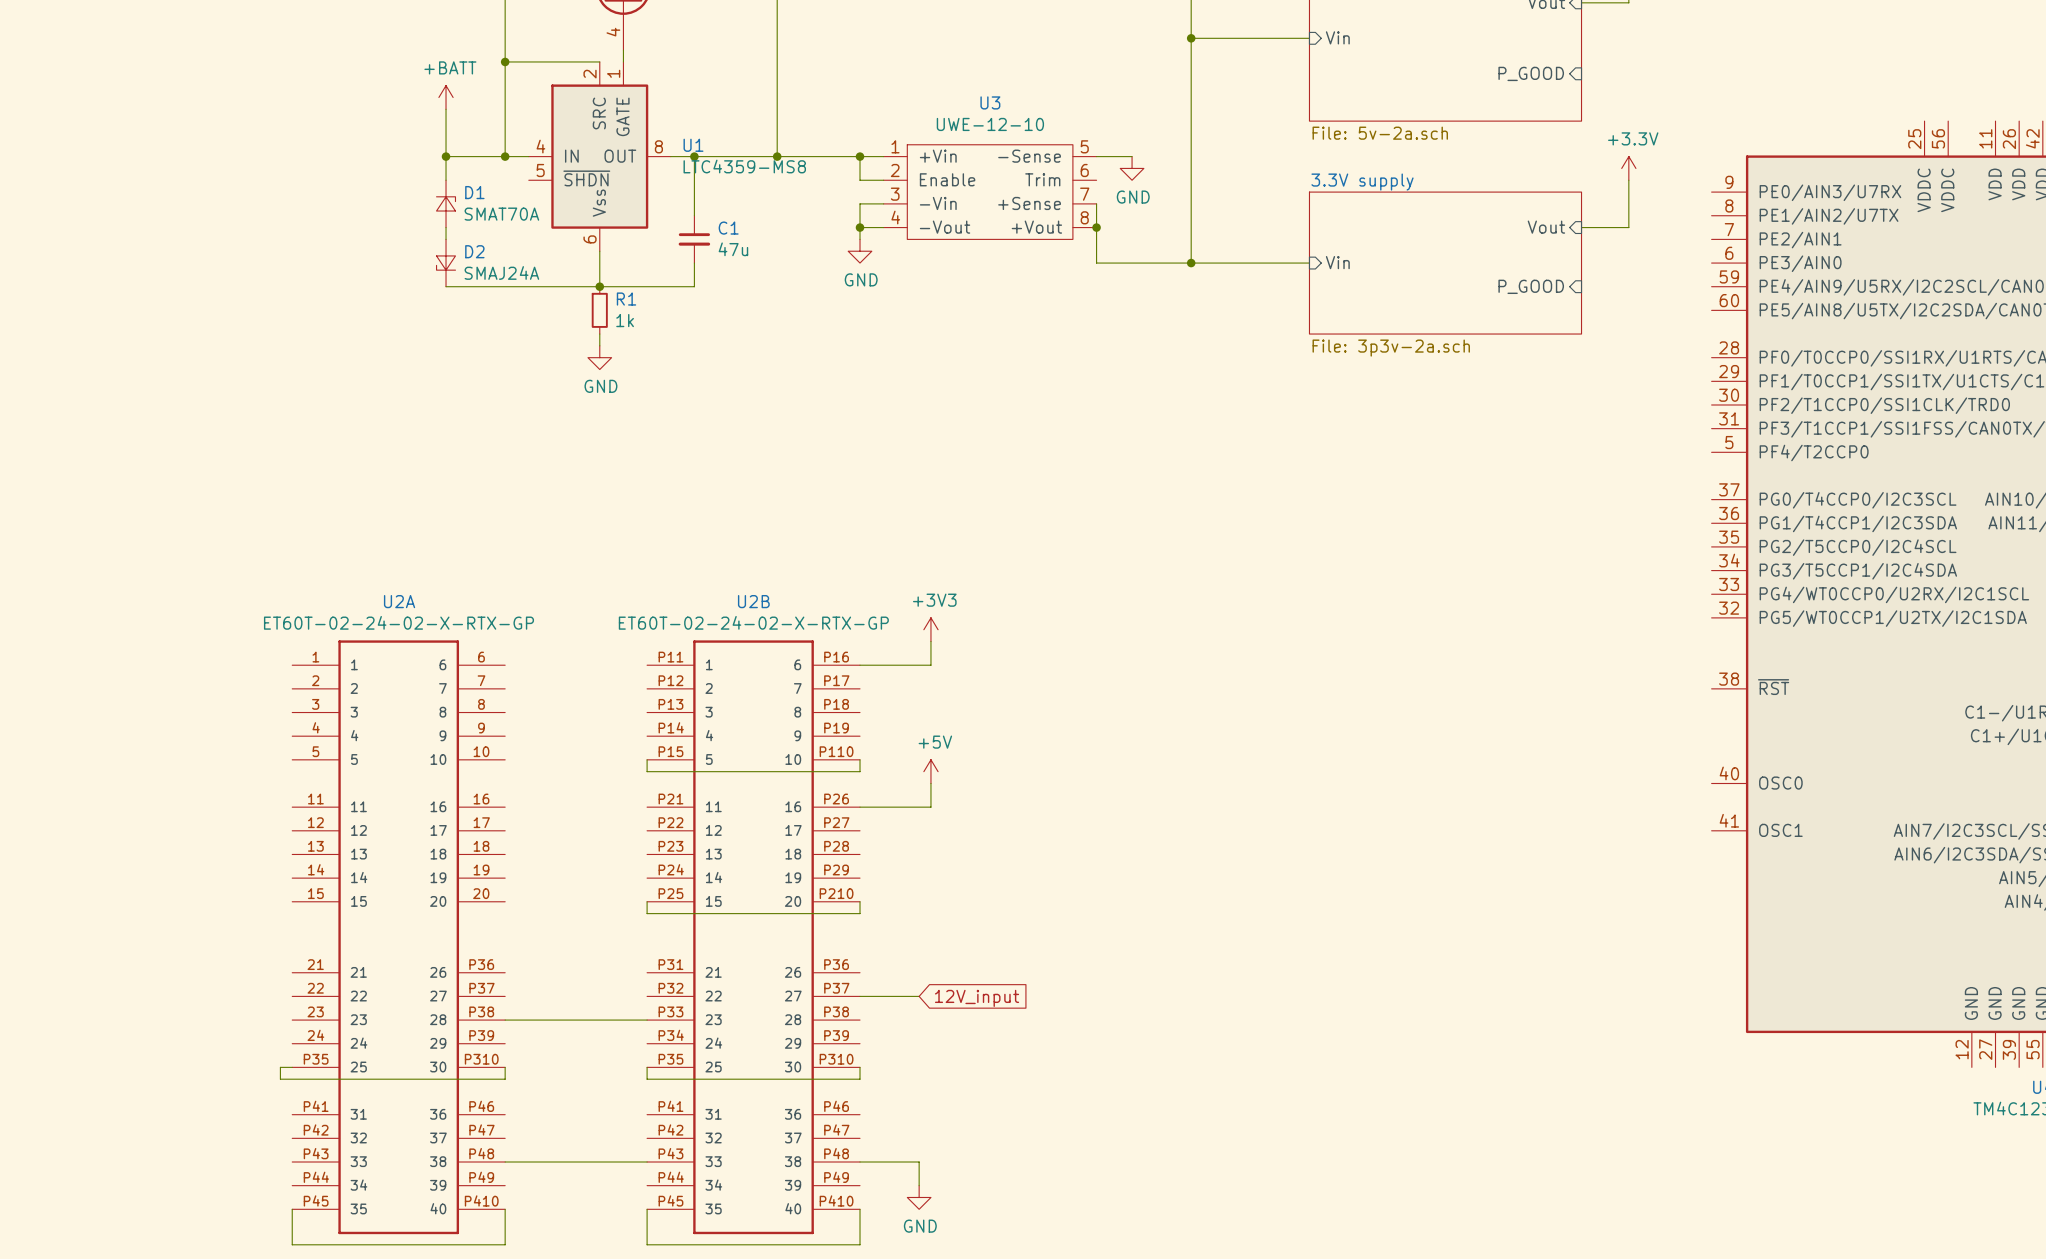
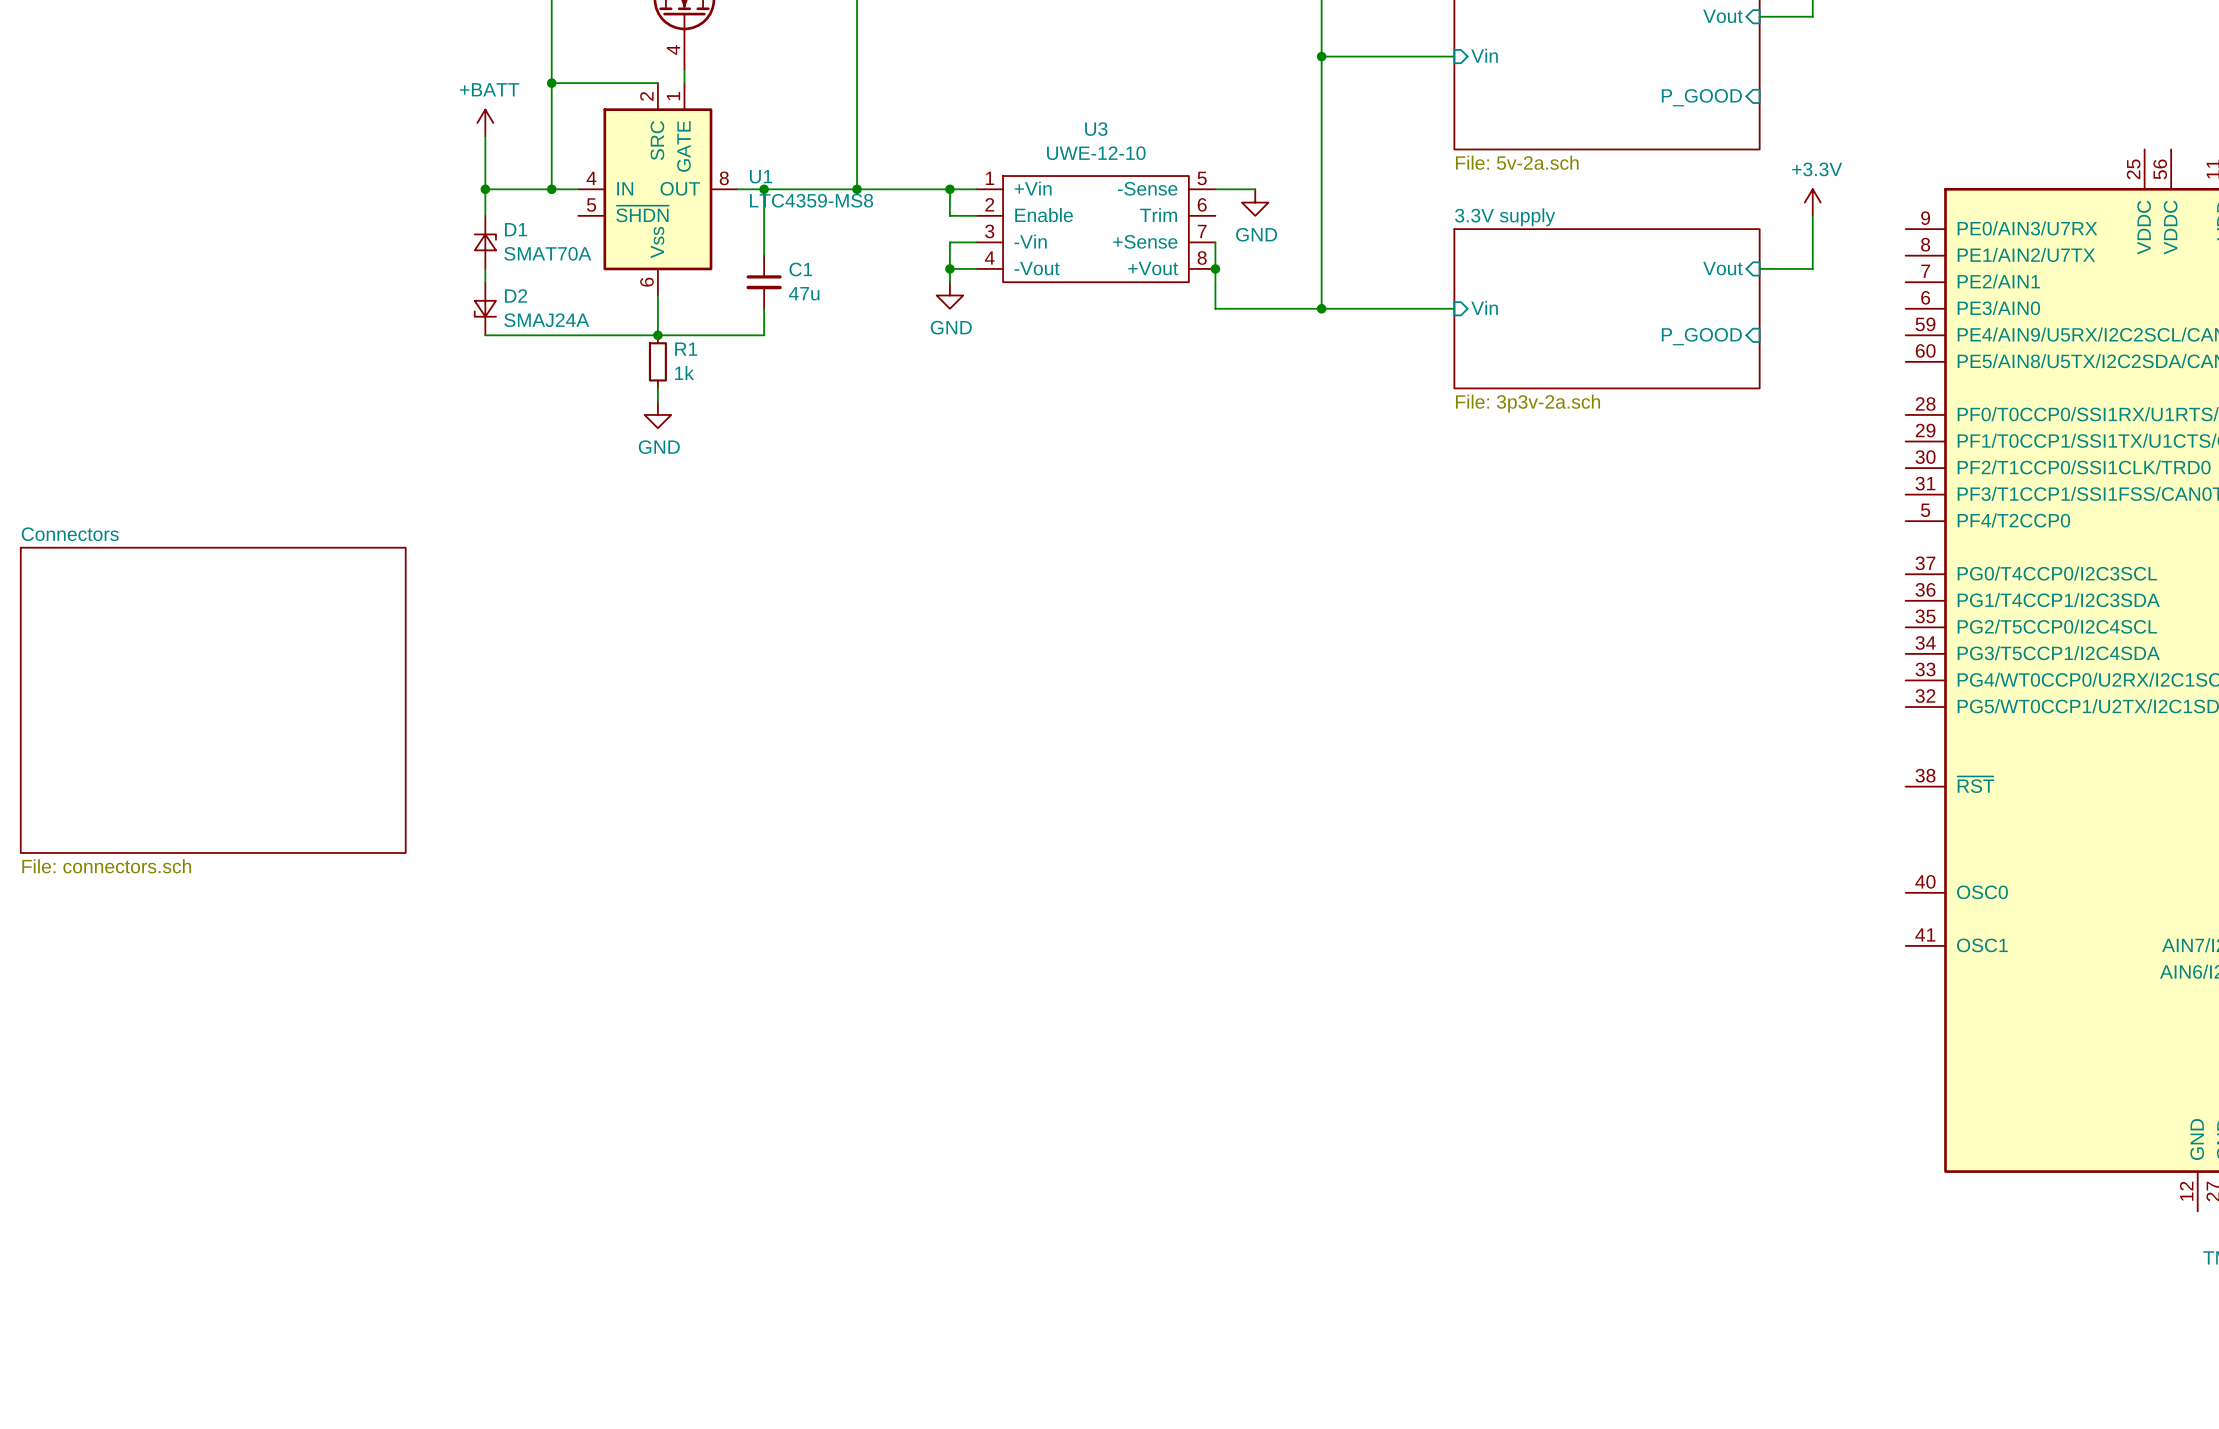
sheet Connectors: none -> File: connectors.sch (213, 700)
power symbol: +3V3 (930, 629) -> none
wire: (930, 641) (930, 665) (860, 665) -> none
wire: (647, 759) (647, 771) (860, 771) (860, 759) -> none
power symbol: +5V (930, 771) -> none
wire: (930, 783) (930, 807) (860, 807) -> none
wire: (647, 901) (647, 913) (860, 913) (860, 901) -> none
U2A: ET60T-02-24-02-X-RTX-GP (398, 937) -> none
U2B: ET60T-02-24-02-X-RTX-GP (753, 937) -> none
wire: (860, 996) (919, 996) -> none
global label: 12V_input (977, 998) -> none
wire: (505, 1020) (647, 1020) -> none
wire: (292, 1067) (280, 1067) (280, 1079) (505, 1079) (505, 1067) -> none
wire: (647, 1067) (647, 1079) (860, 1079) (860, 1067) -> none
wire: (505, 1162) (647, 1162) -> none
wire: (860, 1162) (919, 1162) (919, 1185) -> none
power symbol: GND (919, 1197) -> none
wire: (292, 1209) (292, 1244) (505, 1244) (505, 1209) -> none
wire: (647, 1209) (647, 1244) (860, 1244) (860, 1209) -> none

